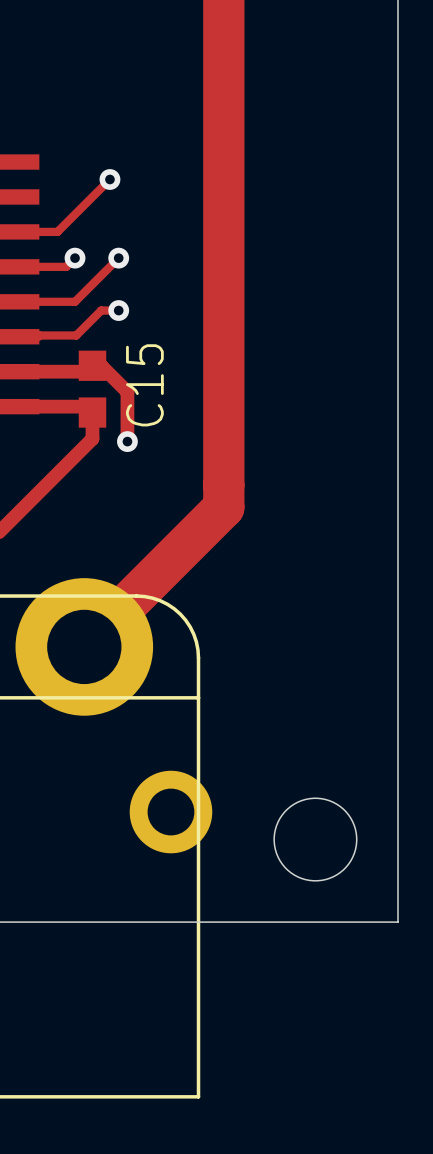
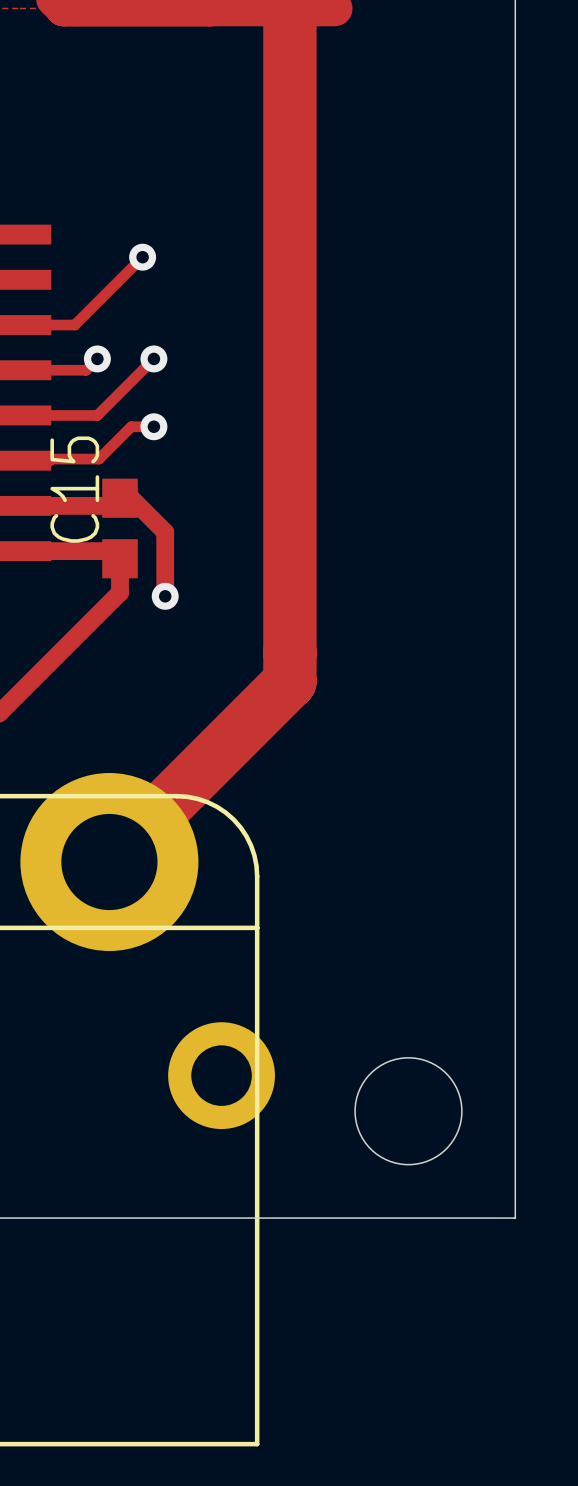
C15 name position: C15 (144, 385) -> C15 (74, 489)

